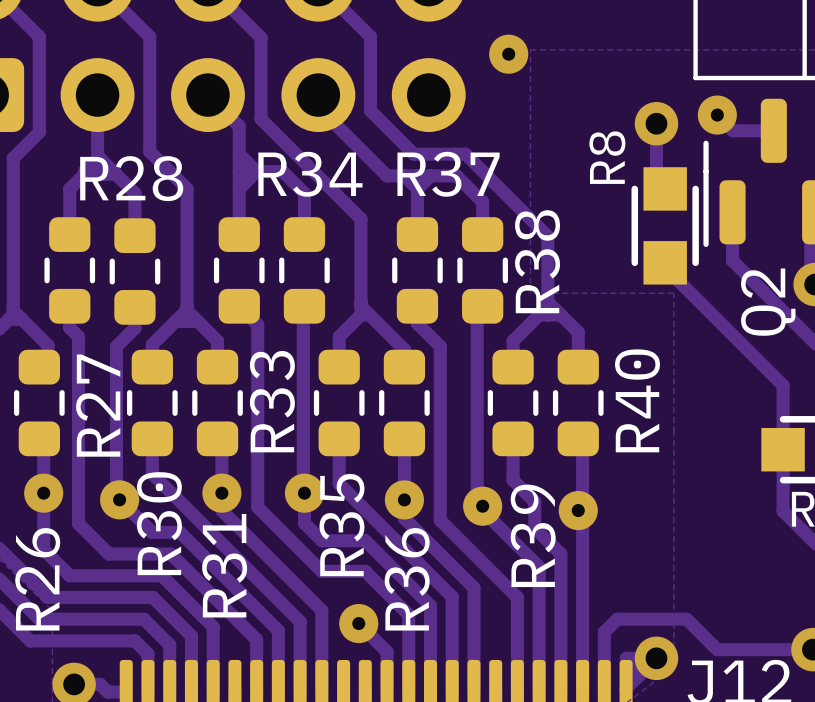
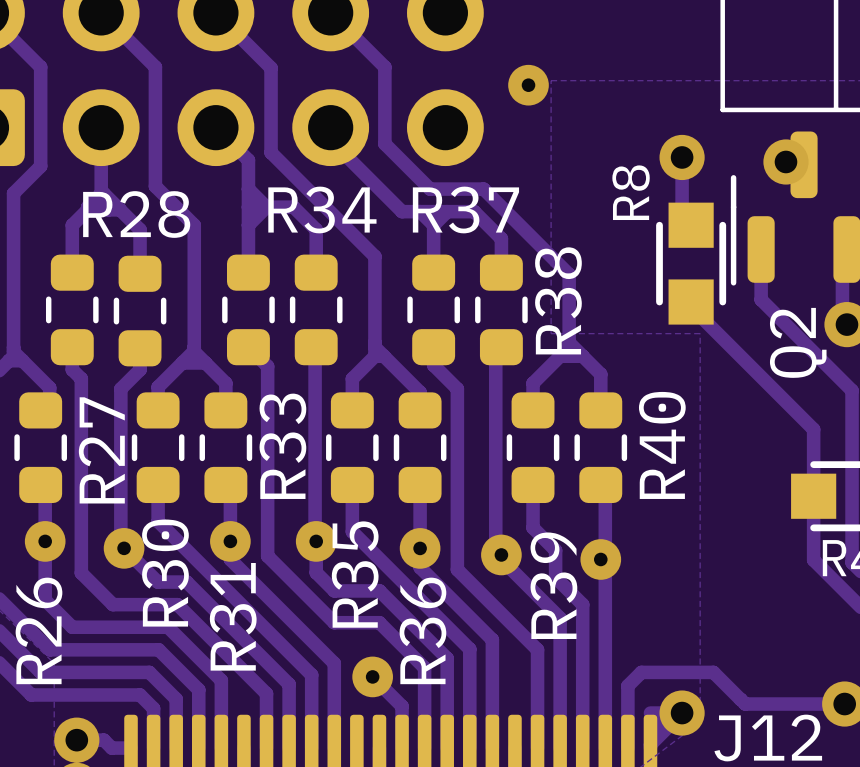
track: (717, 115) (733, 130) (773, 130) -> none
via position: (717, 115) -> (785, 161)

